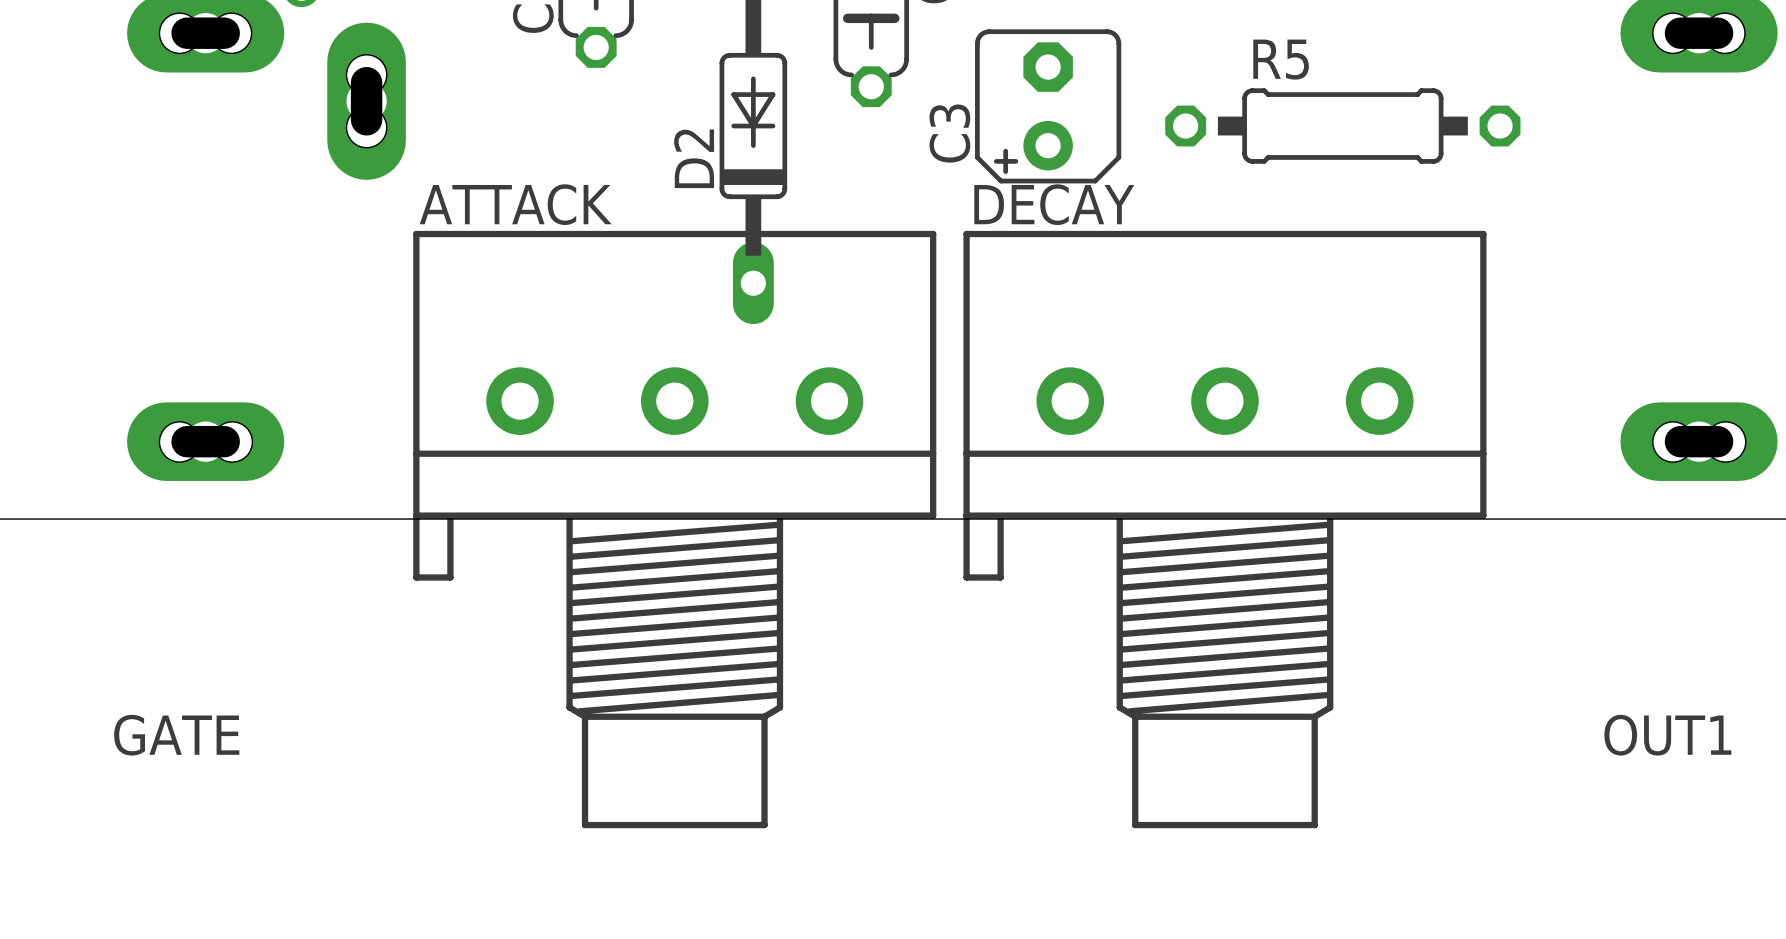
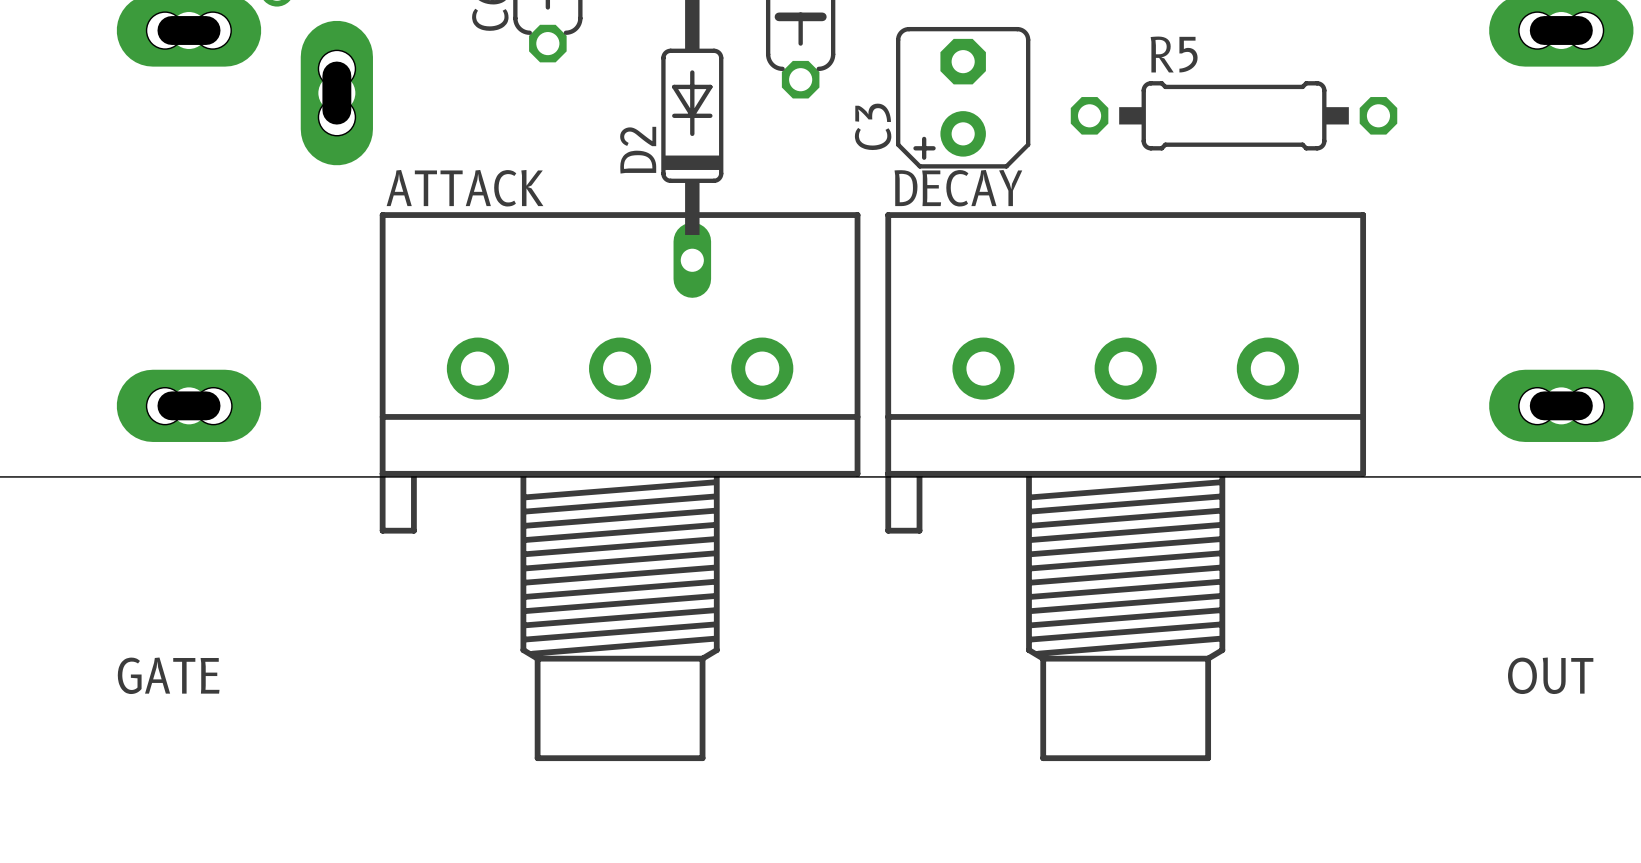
OUT1 name: OUT1 (1667, 735) -> OUT (1550, 675)

